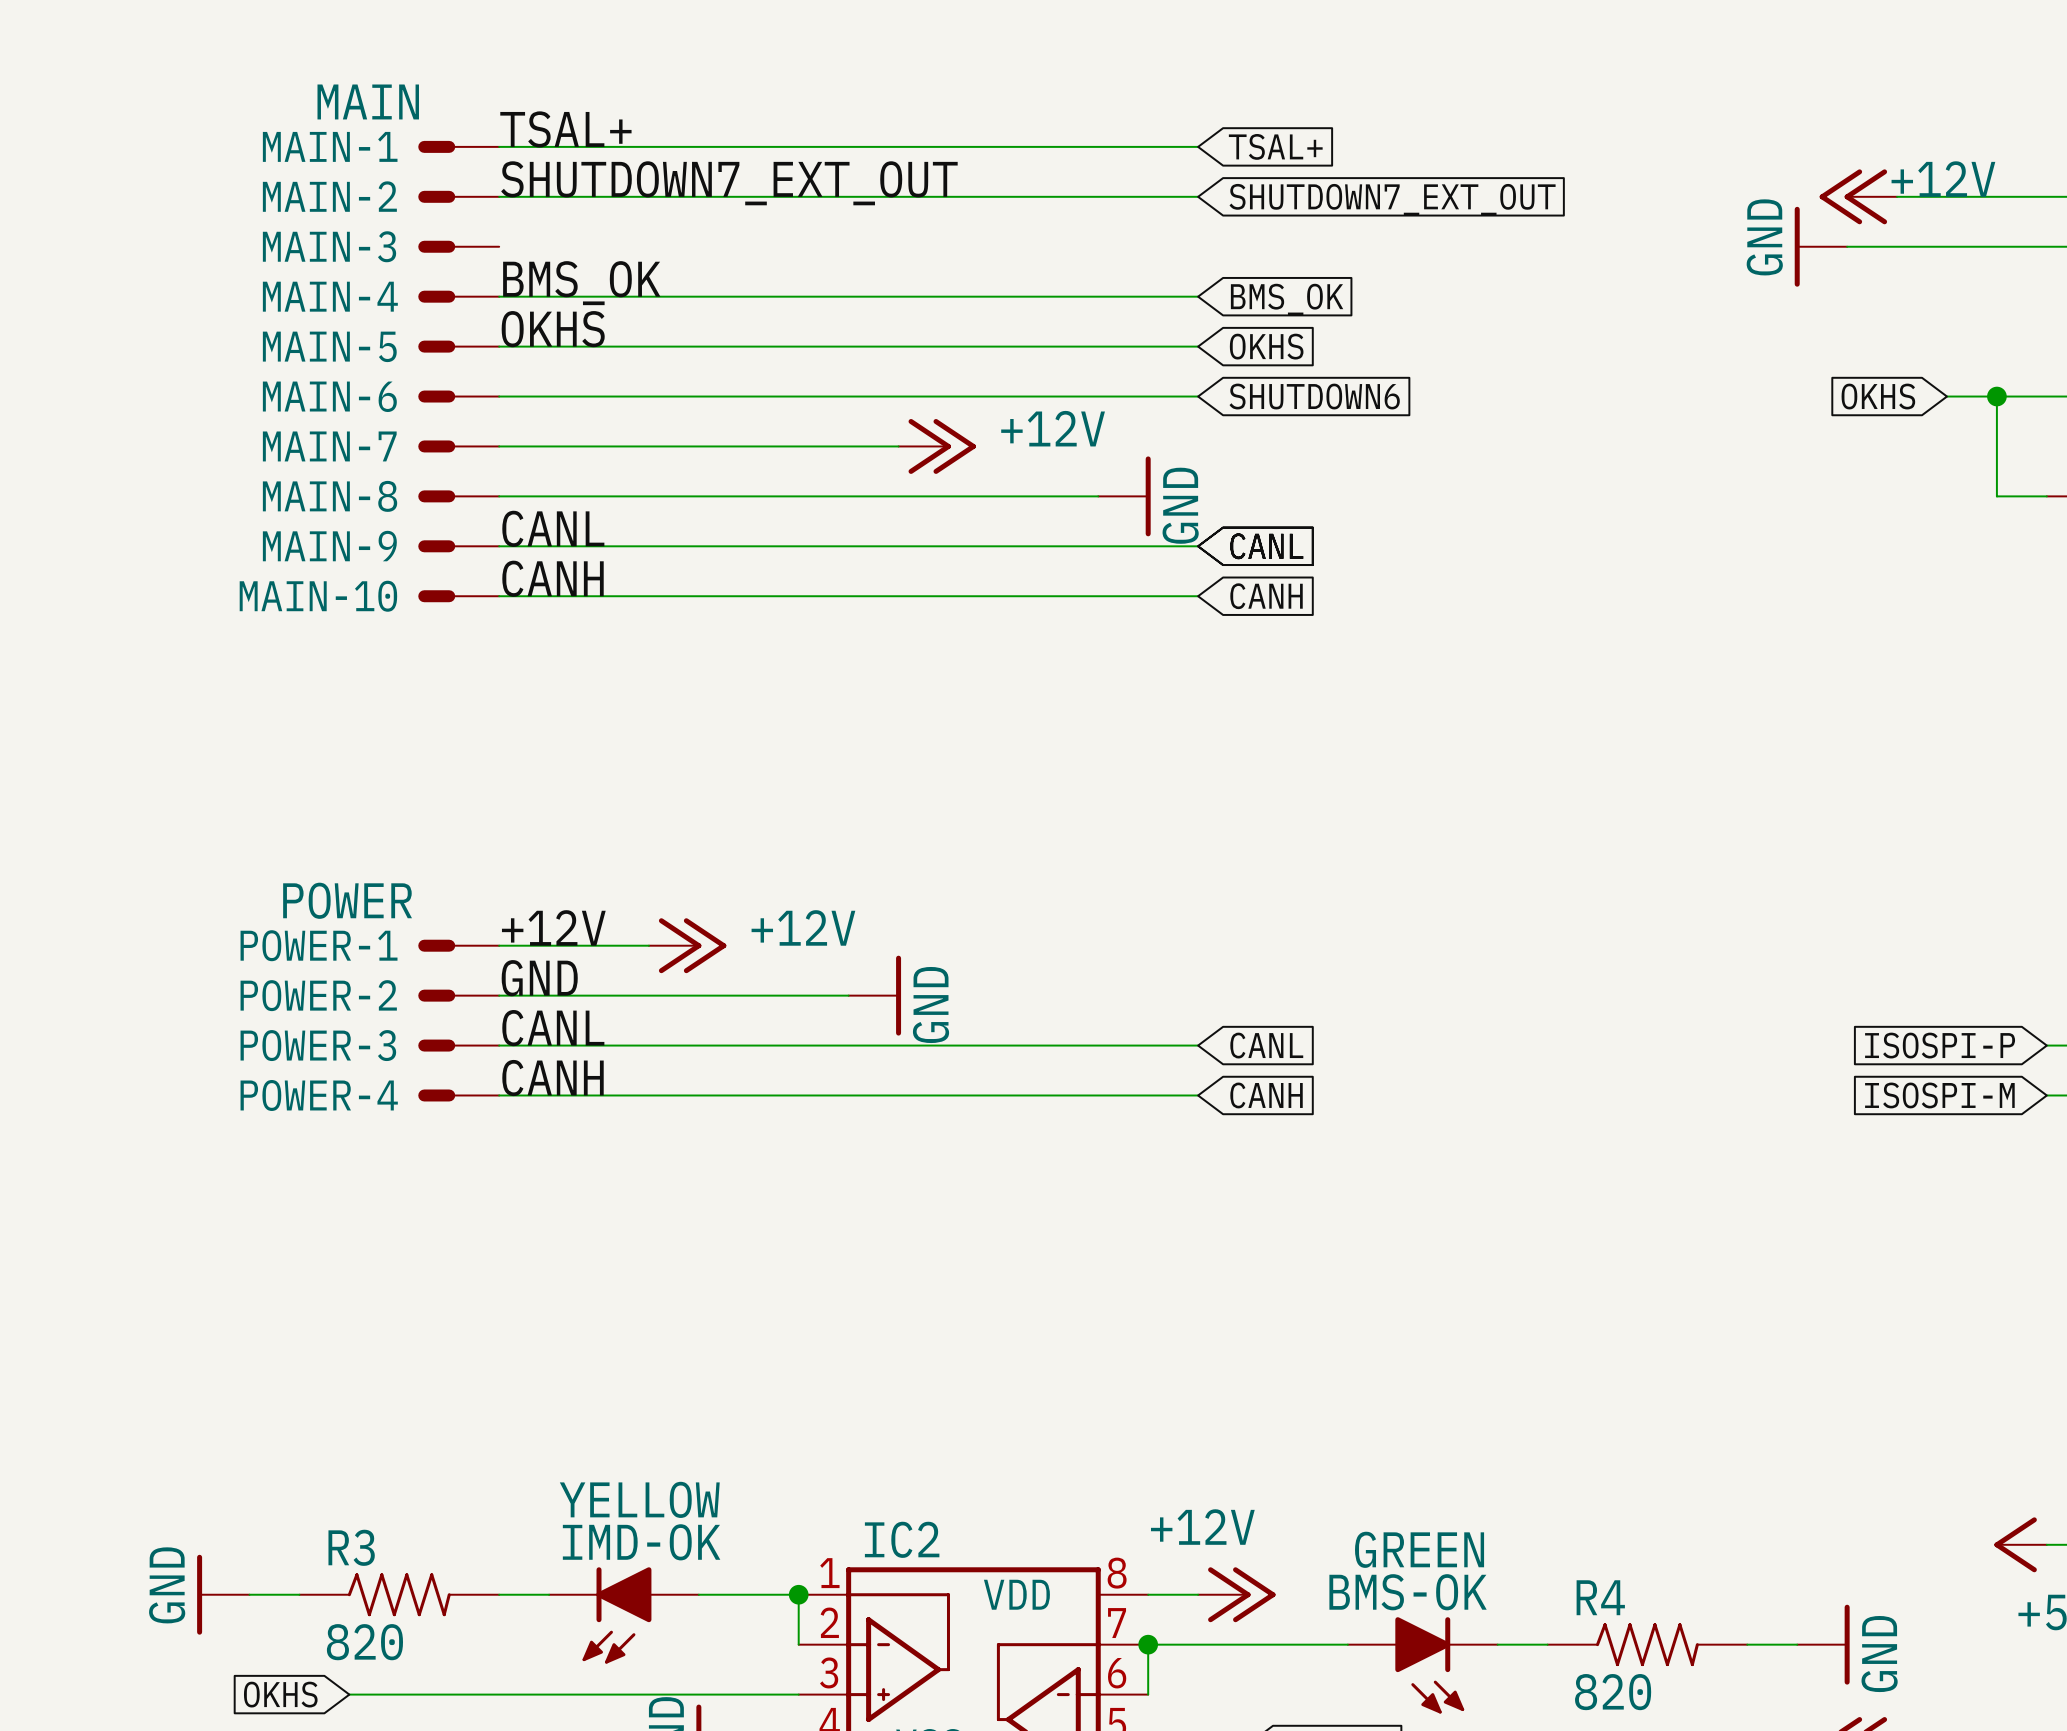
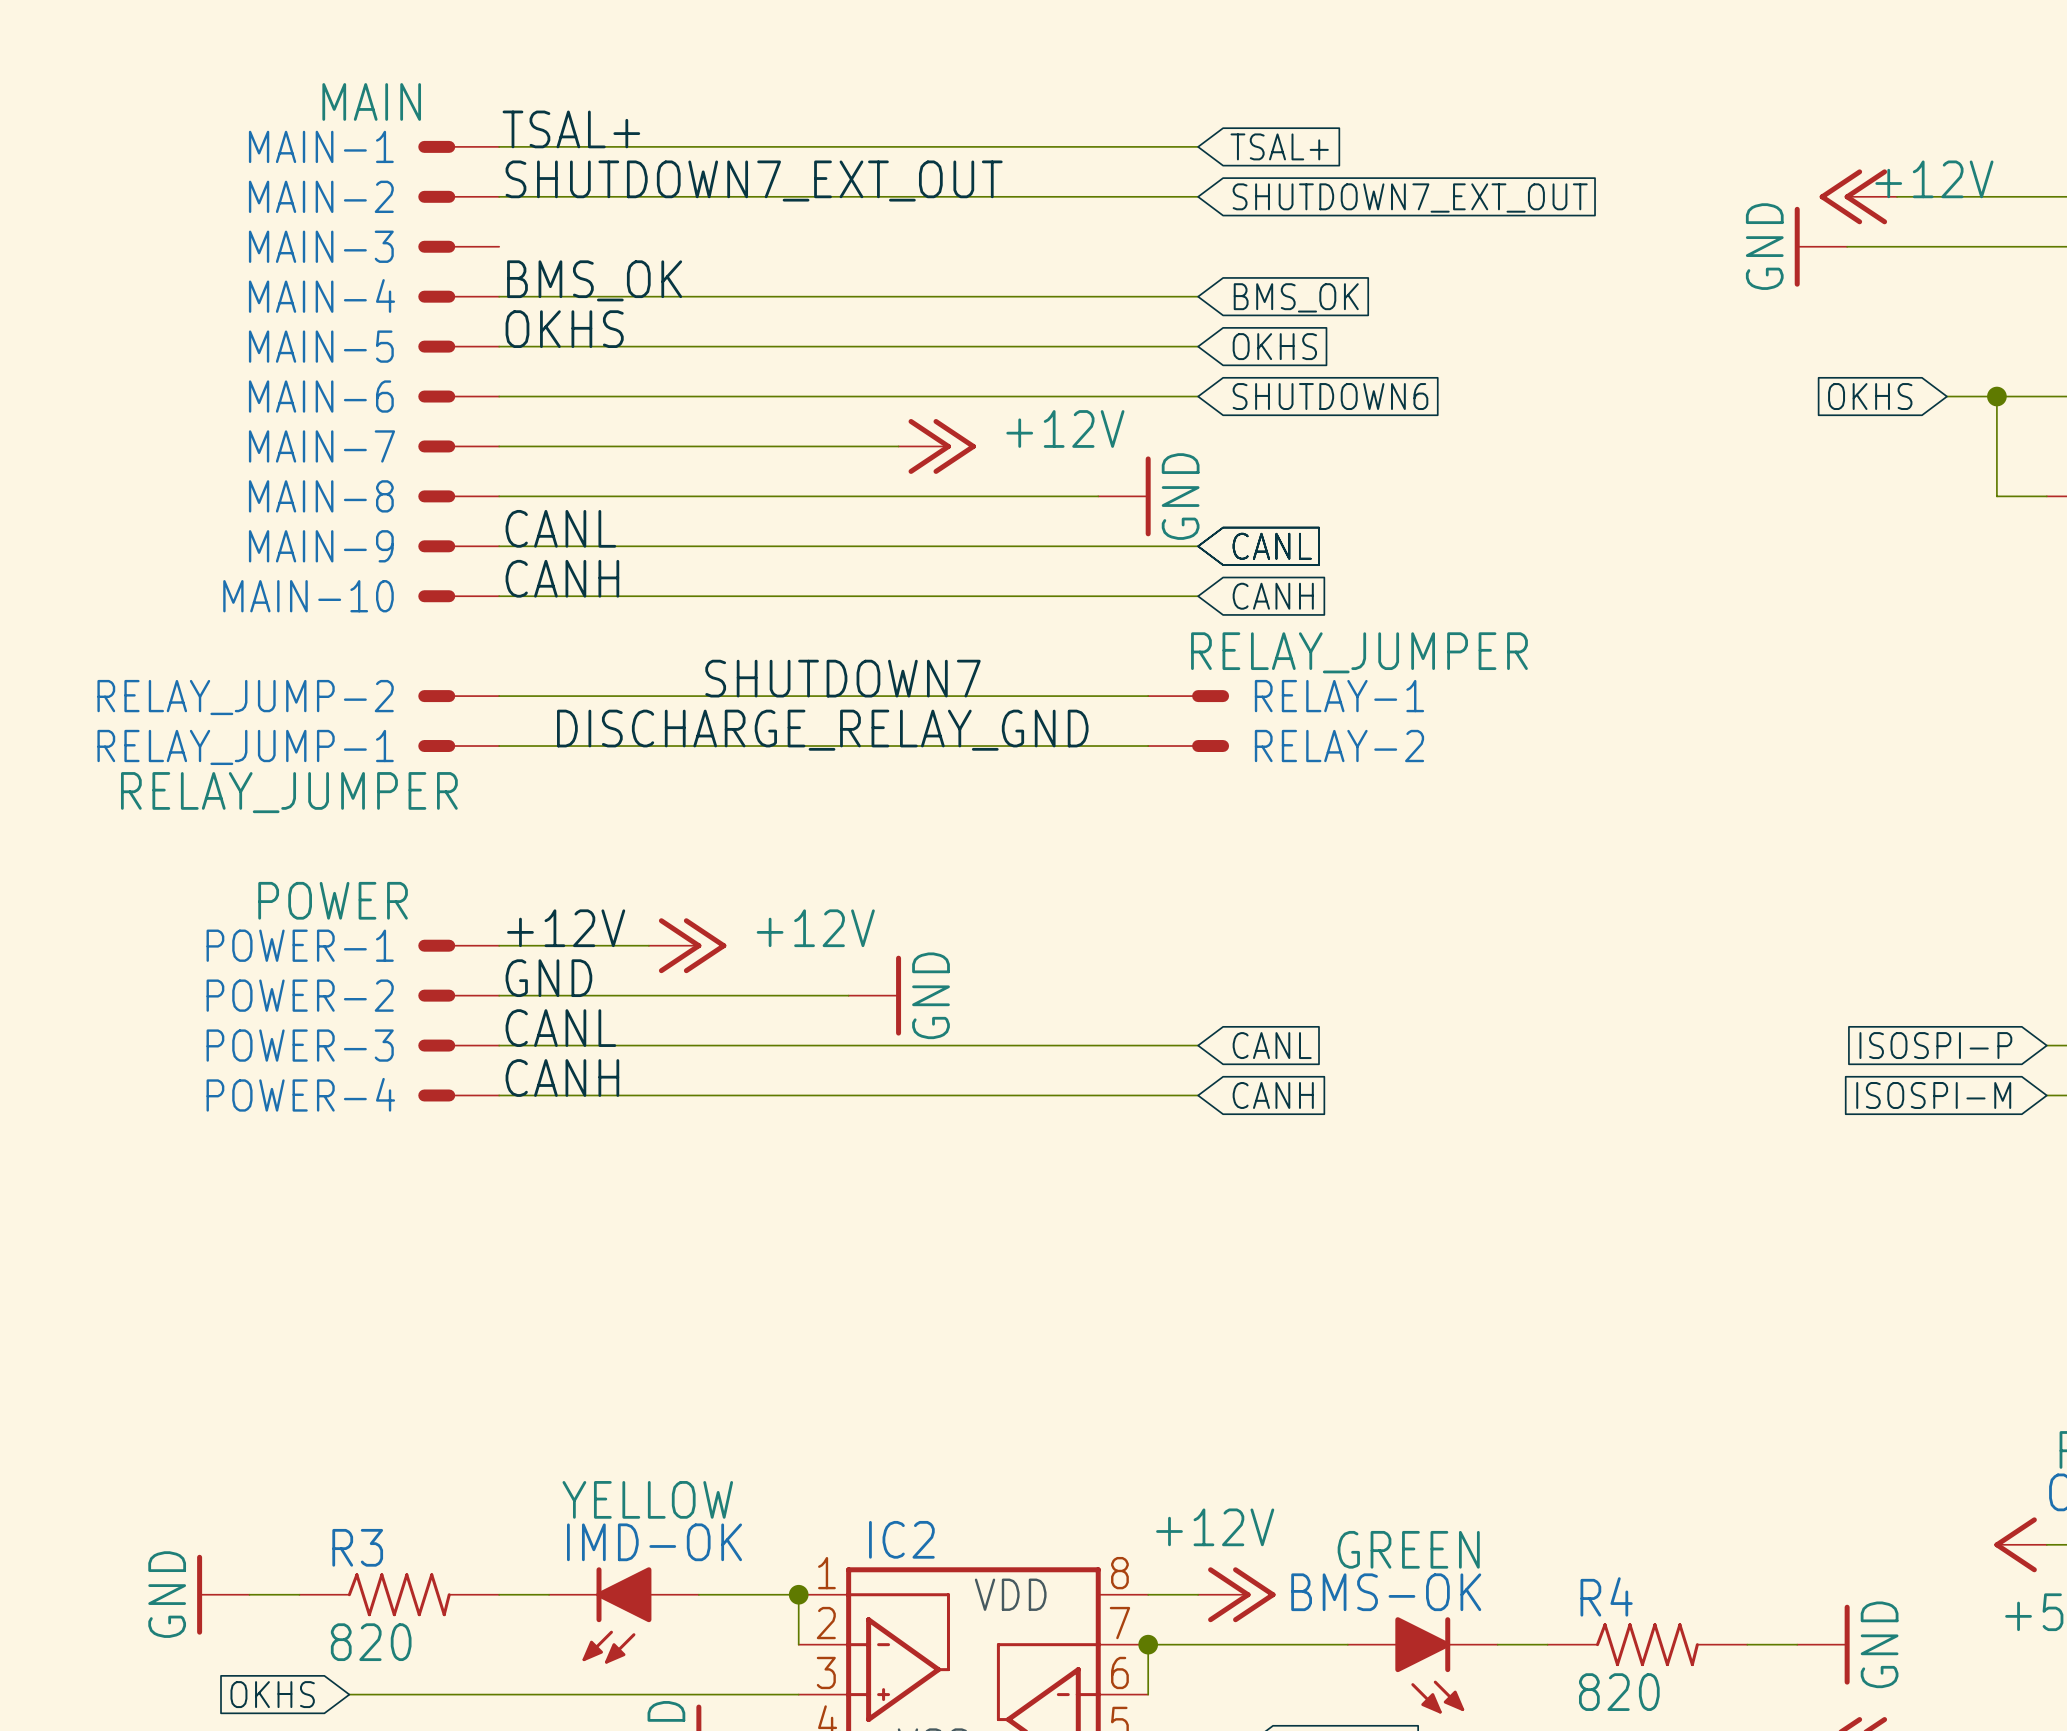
label: none -> SHUTDOWN7 (842, 678)
RELAY_JUMP-2: none -> (458, 696)
wire: none -> (499, 696) (1148, 696)
RELAY-1: none -> RELAY_JUMPER (1188, 696)
label: none -> DISCHARGE_RELAY_GND (822, 730)
RELAY_JUMP-1: none -> RELAY_JUMPER (458, 746)
wire: none -> (499, 746) (1148, 746)
RELAY-2: none -> (1188, 746)

